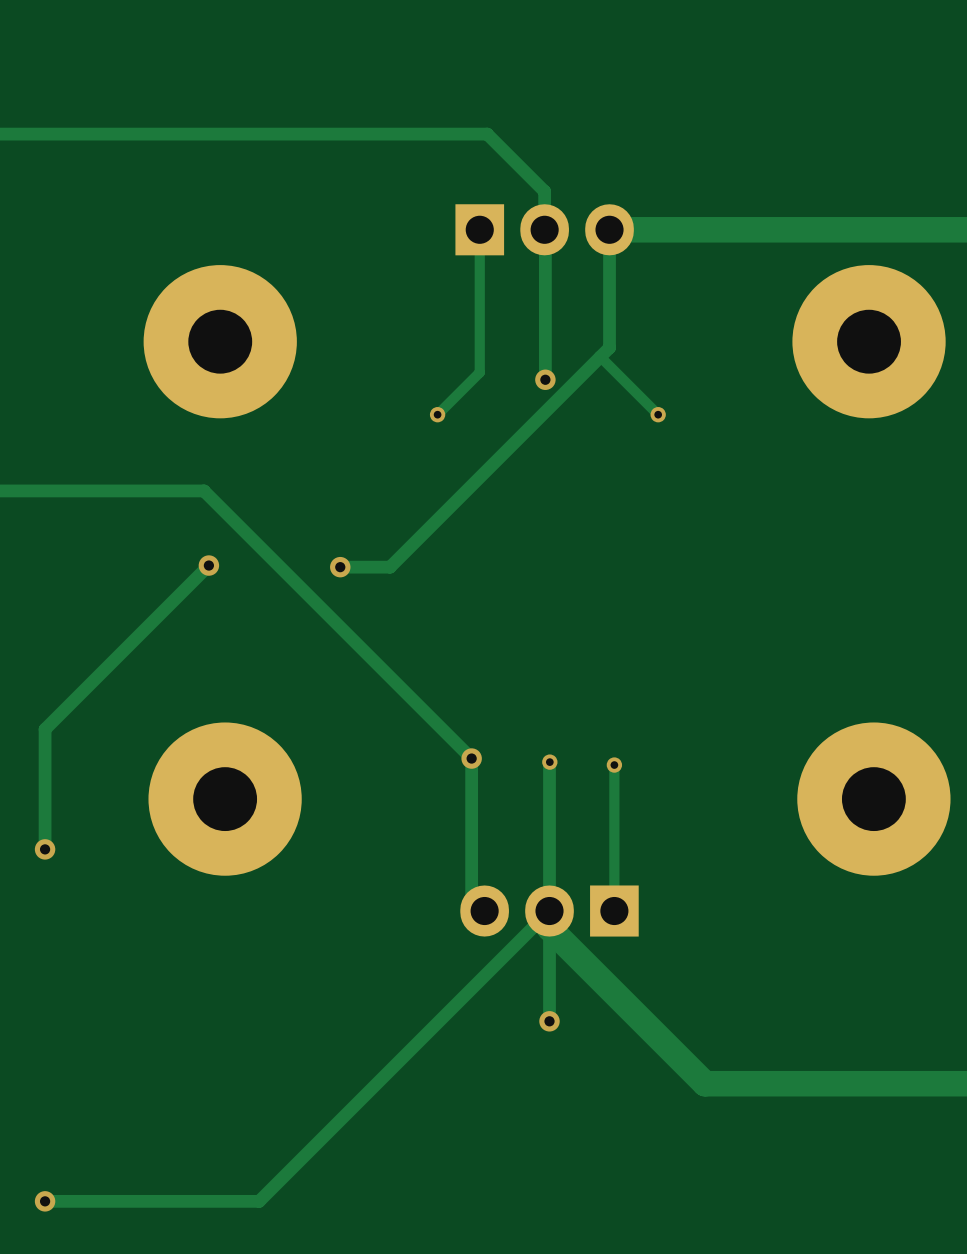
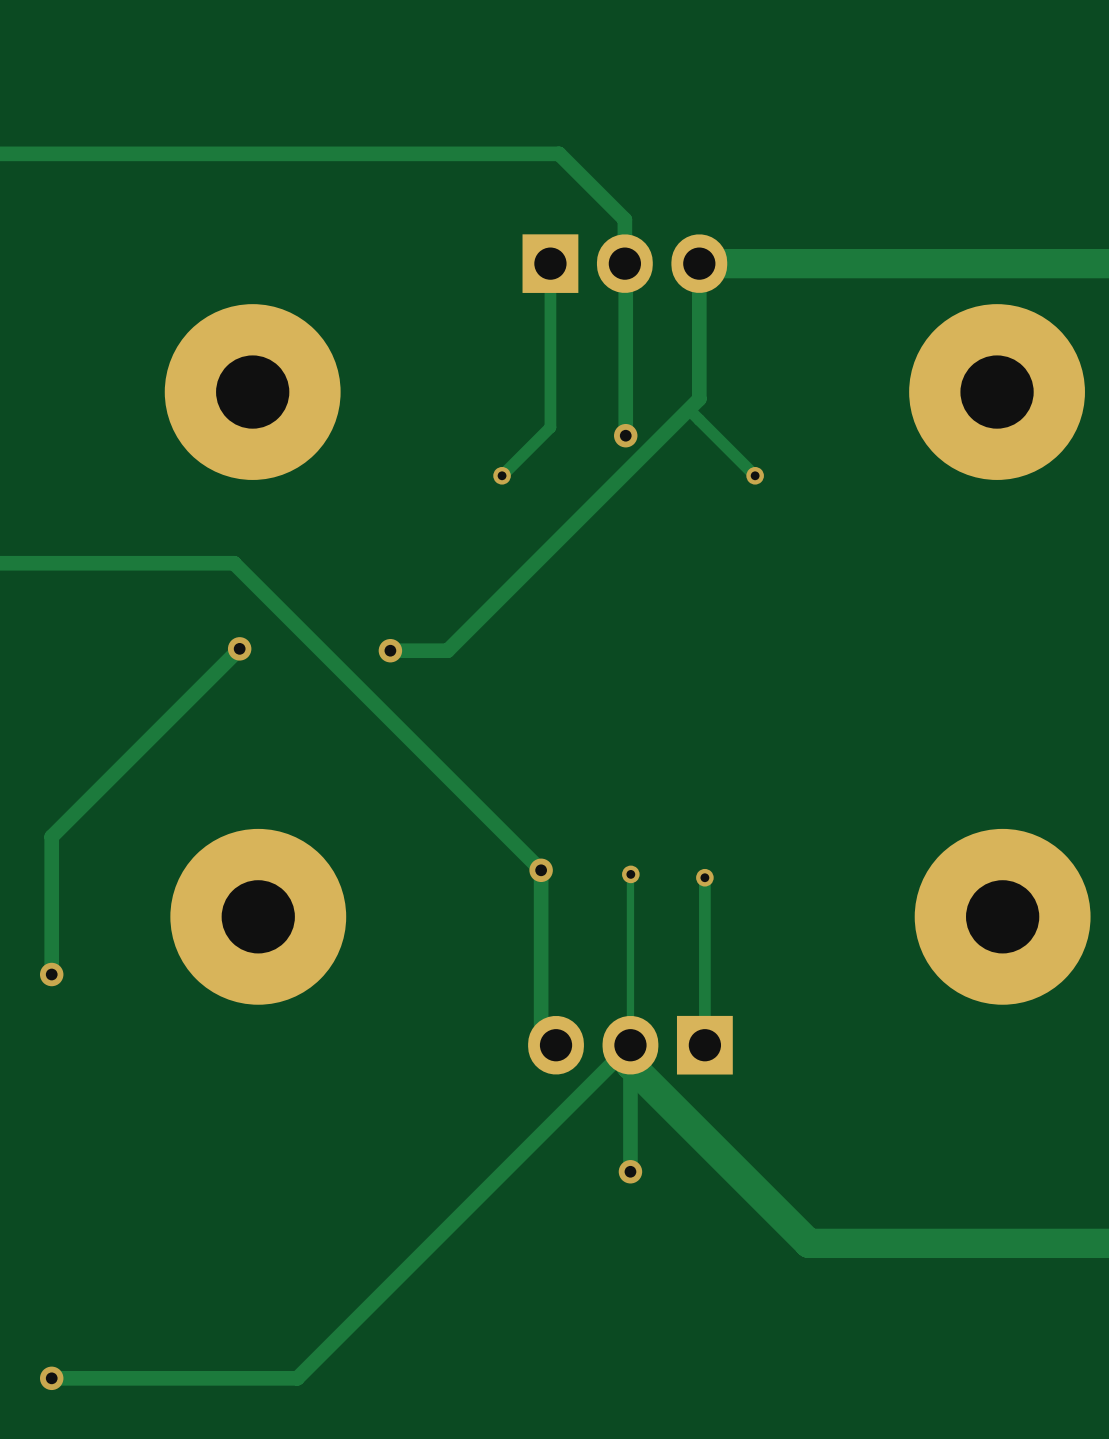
track width: thick (549, 762) (549, 911) -> thin (630, 874) (630, 1045)

